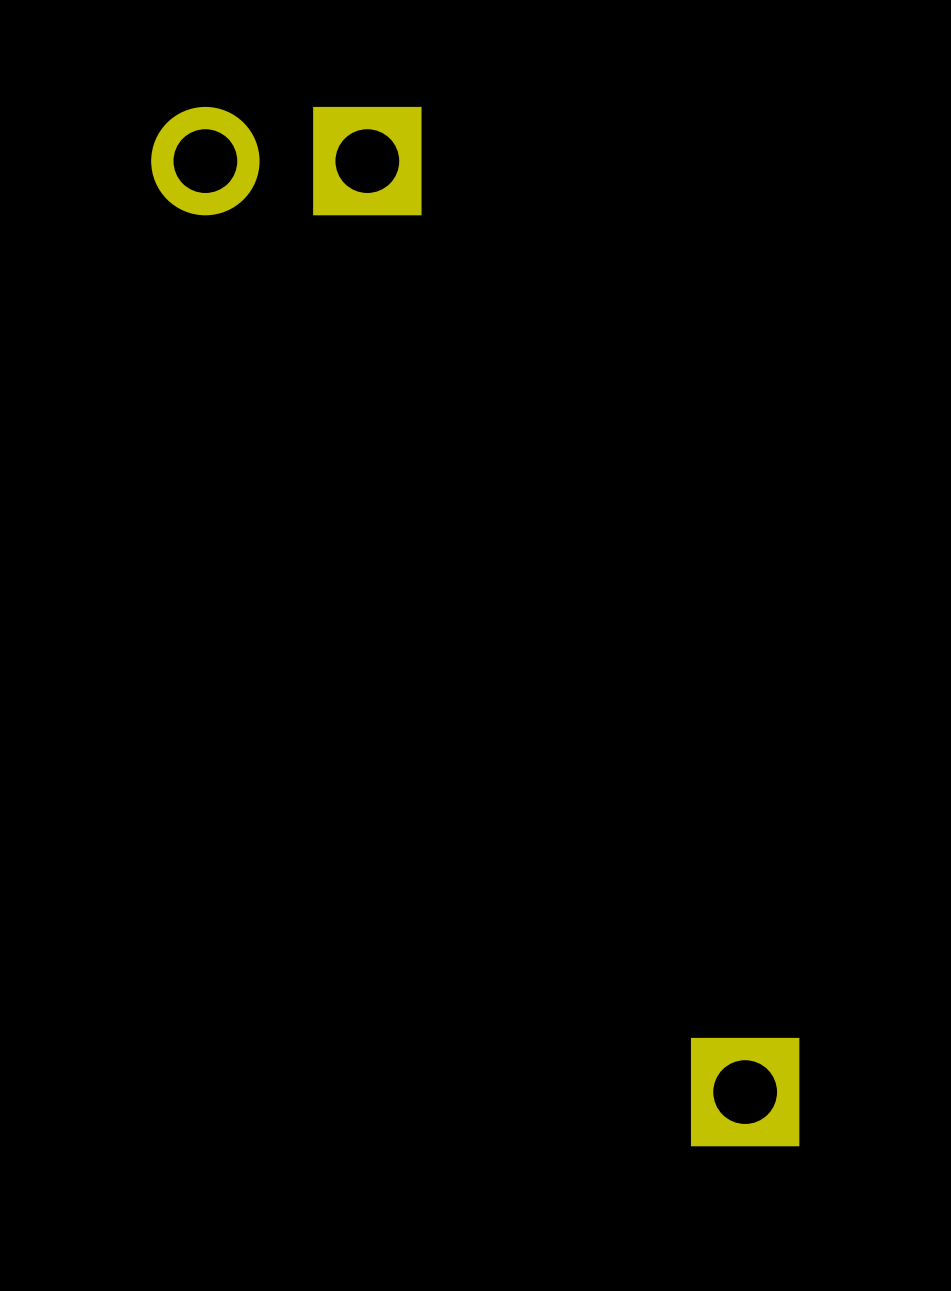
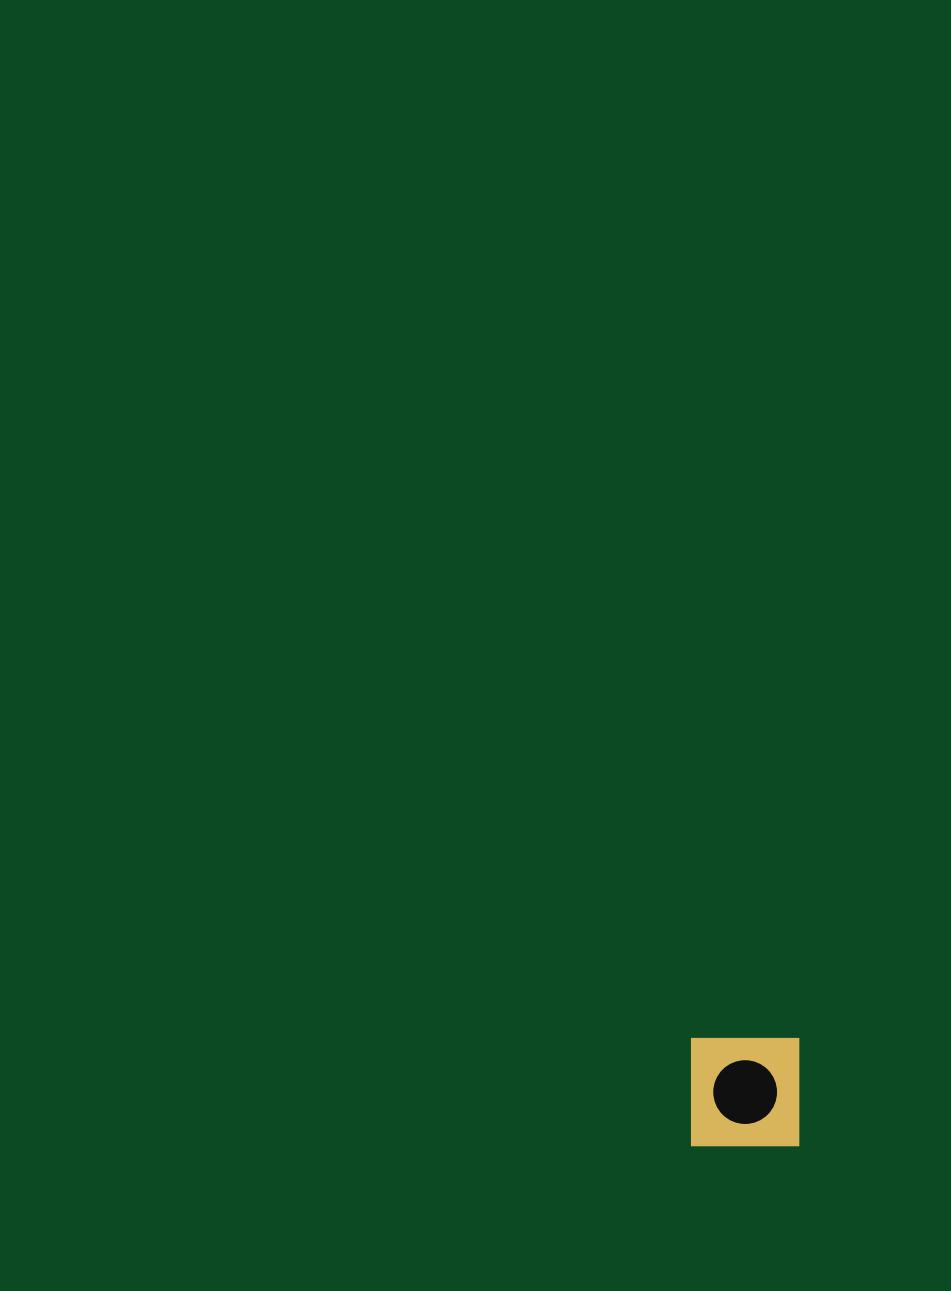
part: (286, 161) -> none

